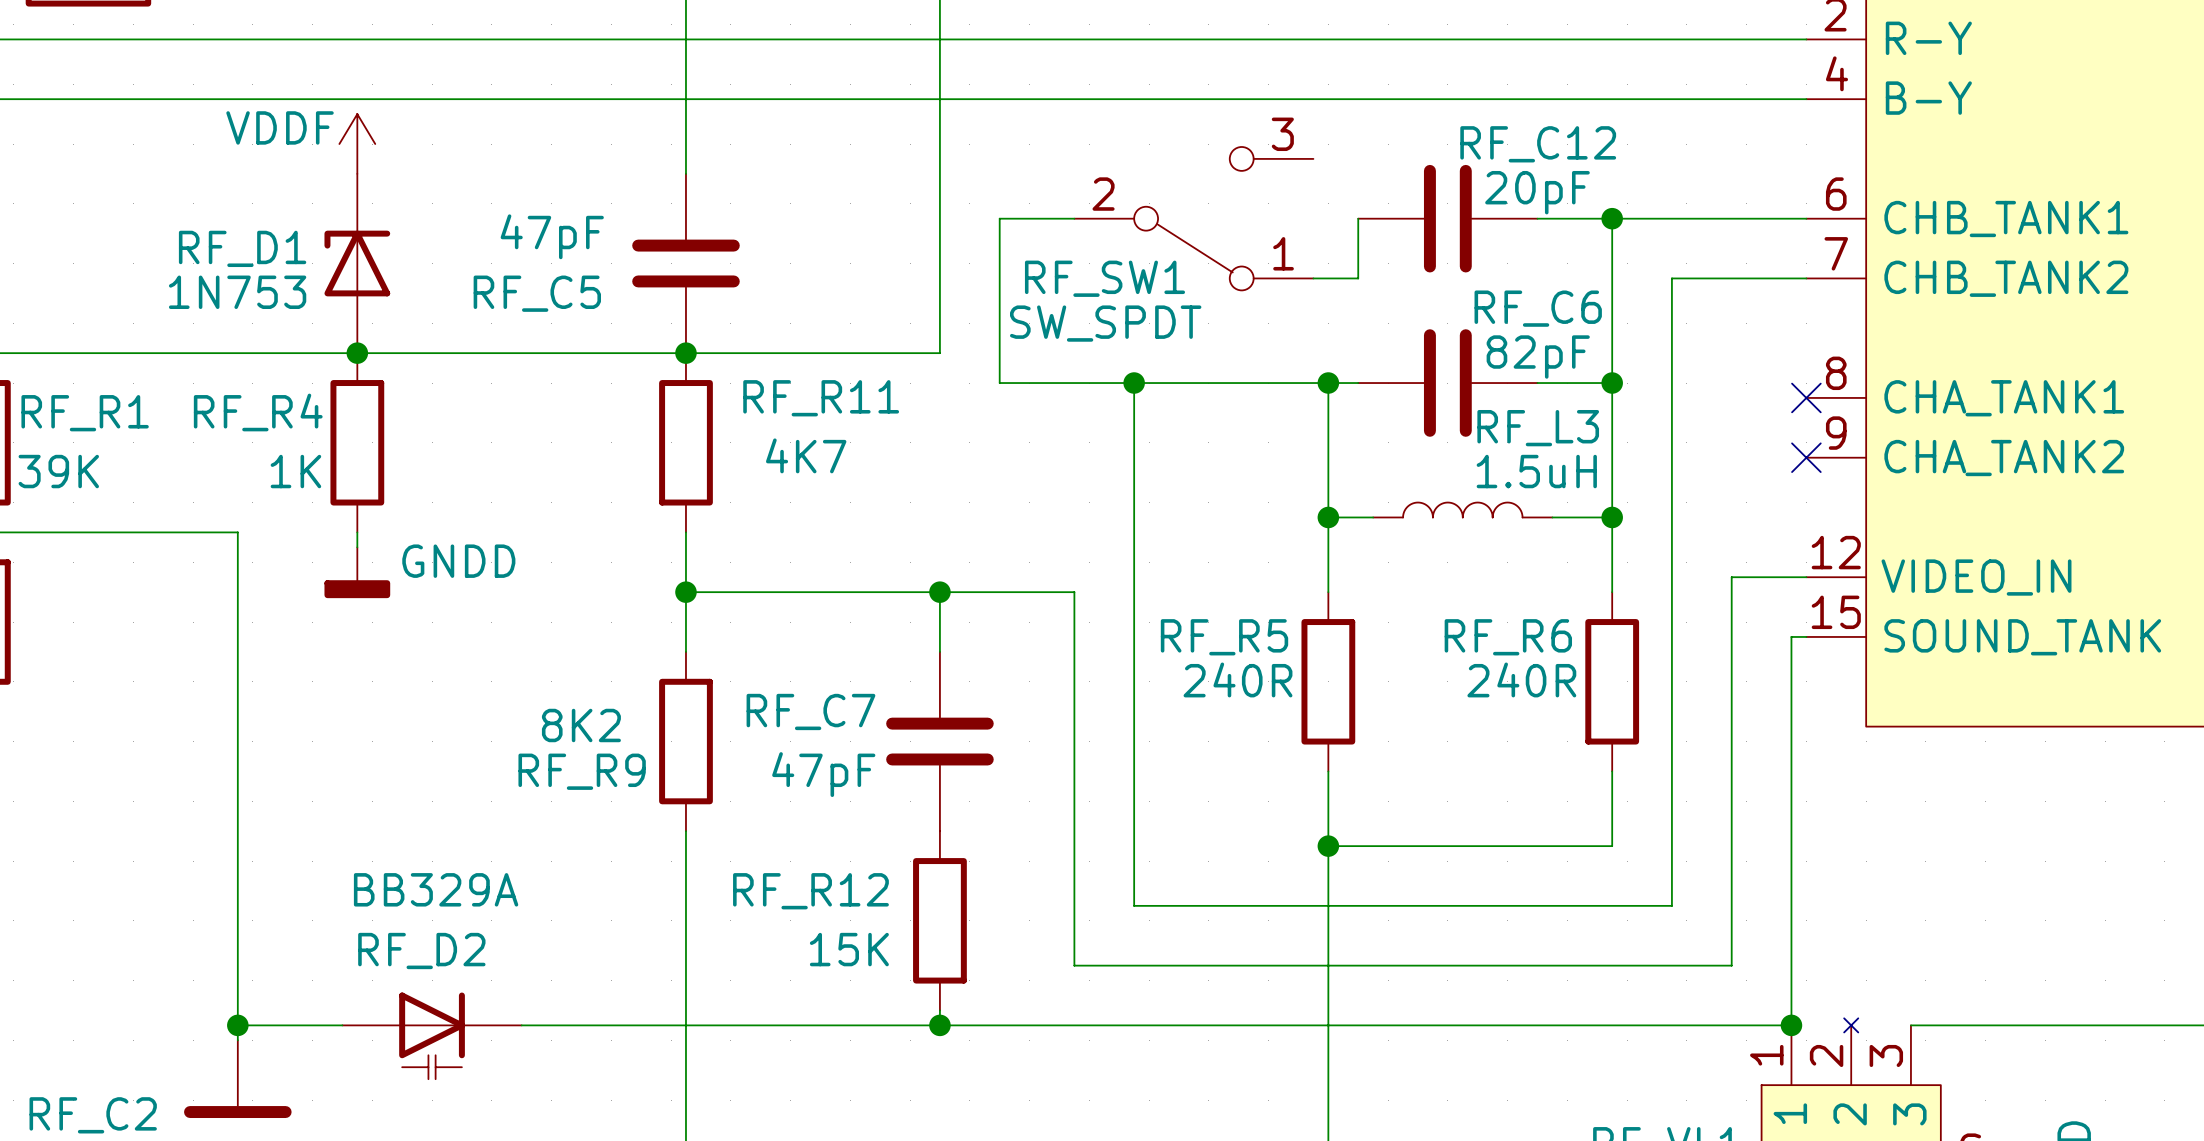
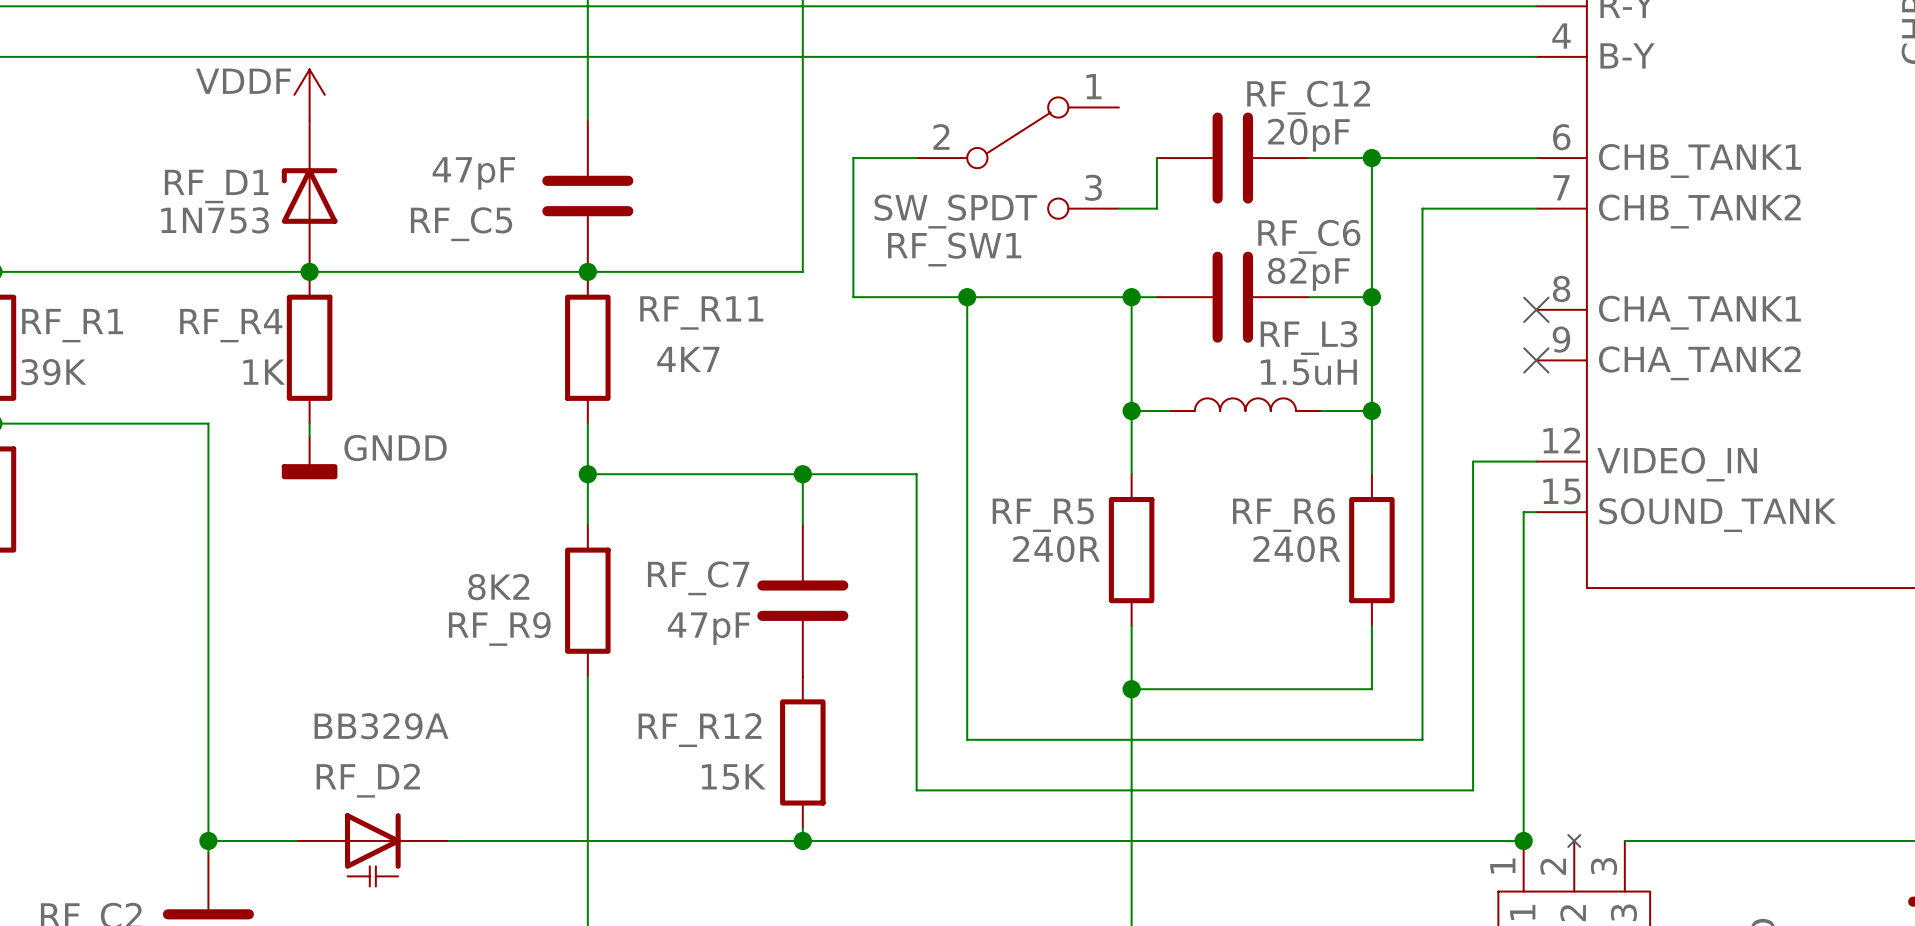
RF_SW1 flip: as is (1193, 218) -> up-down (1017, 158)
RF_SW1 name position: RF_SW1 (1104, 278) -> RF_SW1 (954, 249)
RF_SW1 value position: SW_SPDT (1105, 323) -> SW_SPDT (955, 211)

